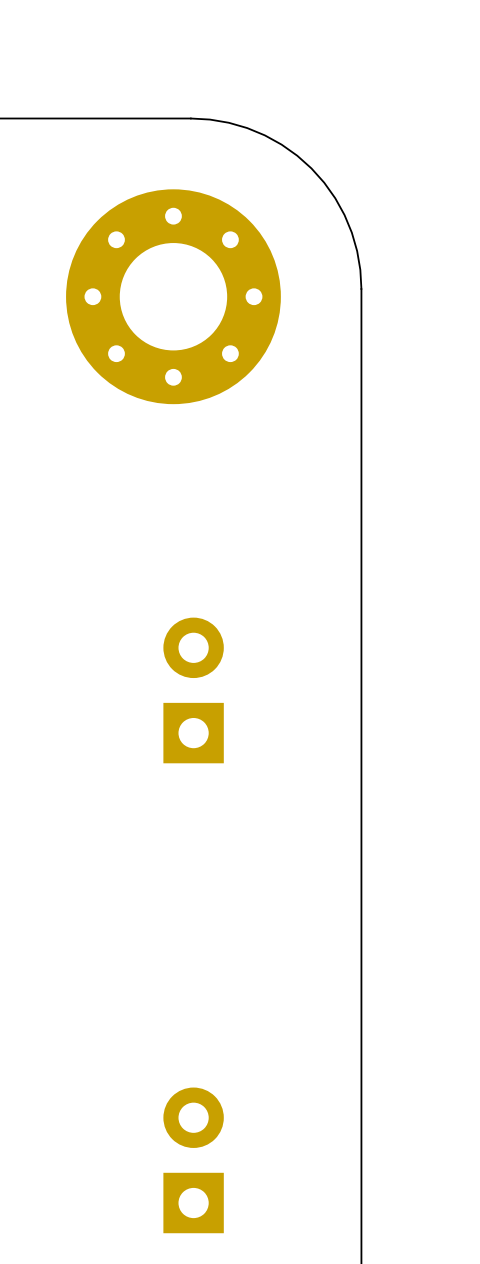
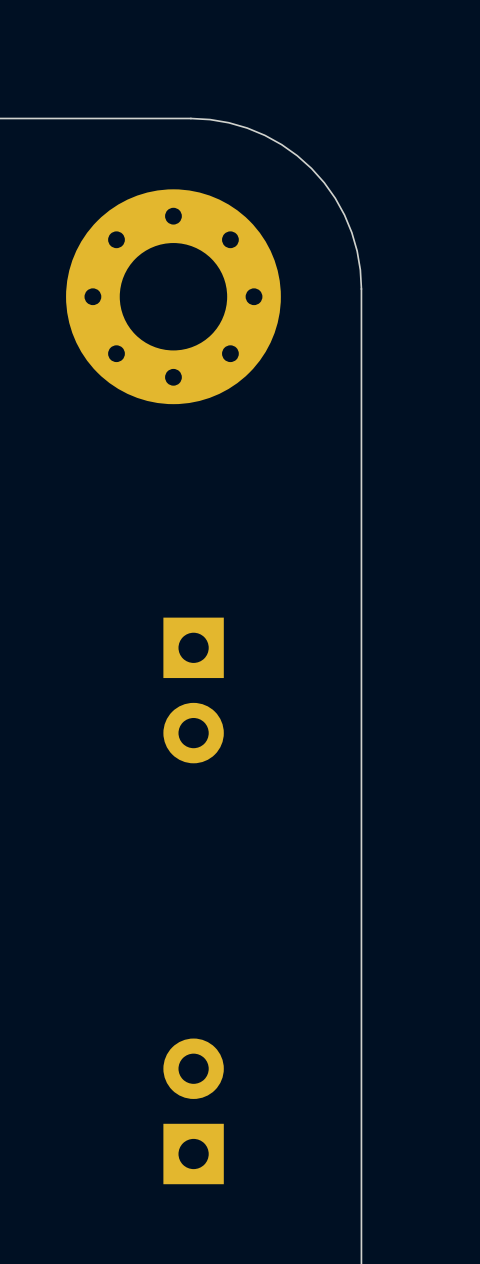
part rotation: 0° (193, 690) -> 180° (193, 690)
part position: (193, 1160) -> (193, 1111)

